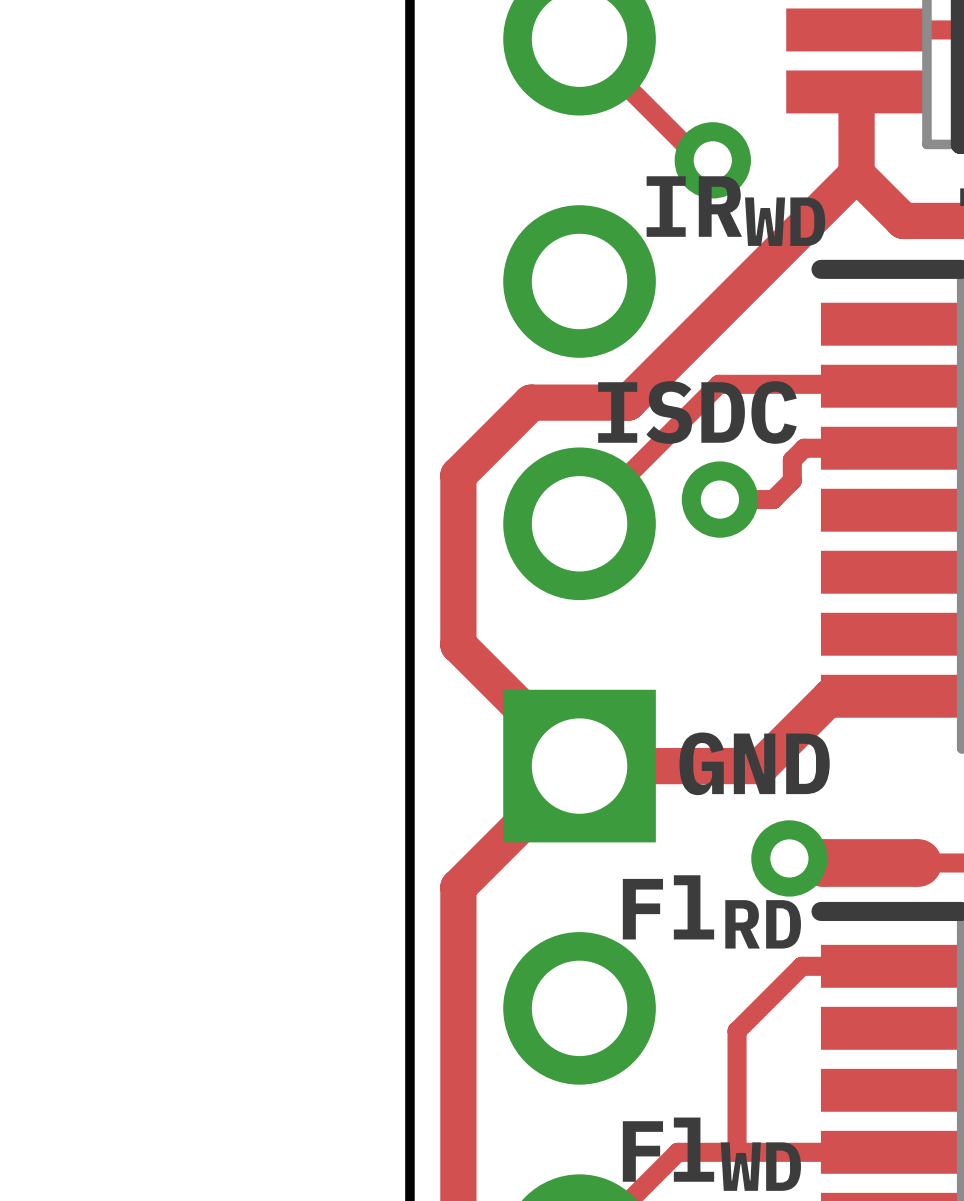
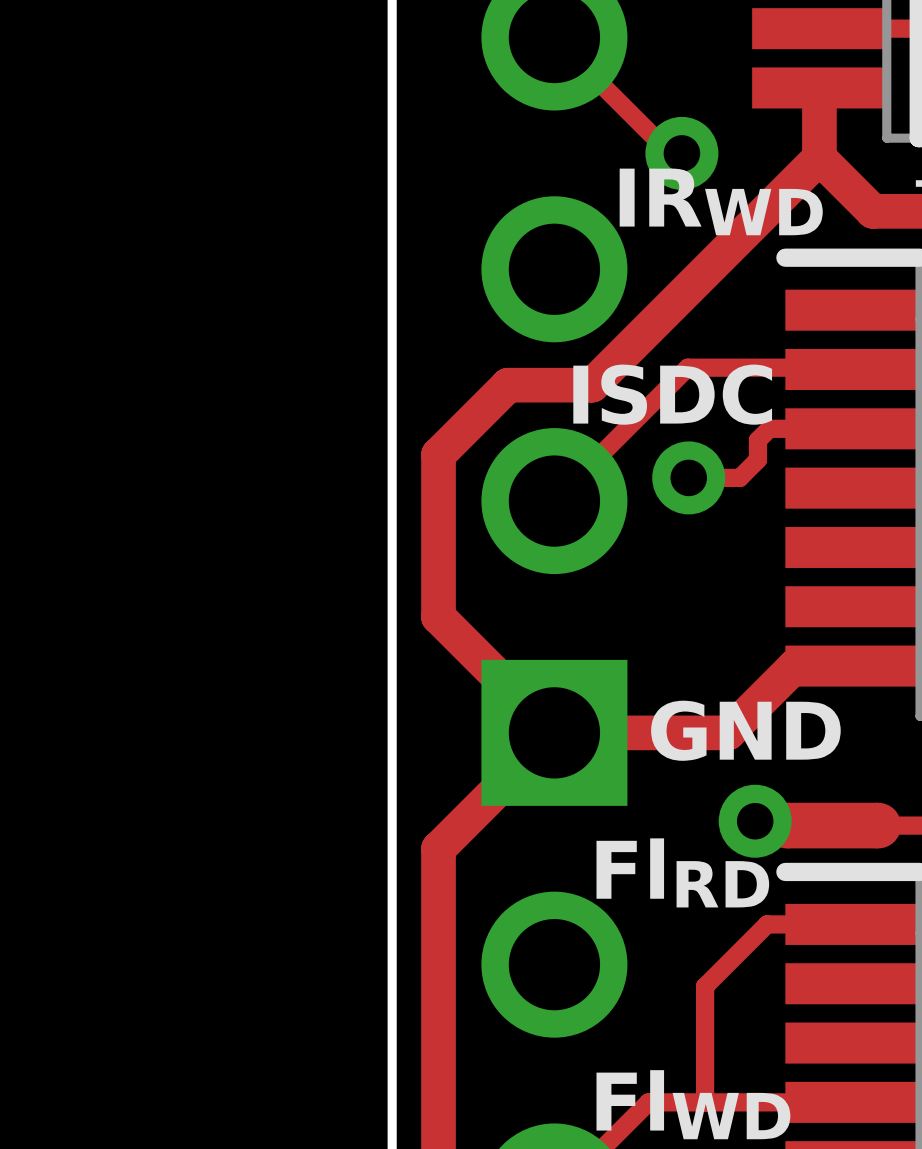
track: (856, 174) (628, 402) (618, 402) -> (872, 211) (819, 157) (592, 385)
track: (856, 174) (903, 220) (912, 220) -> none

